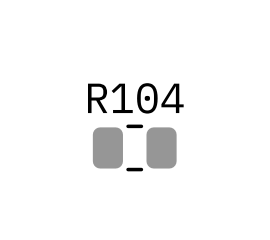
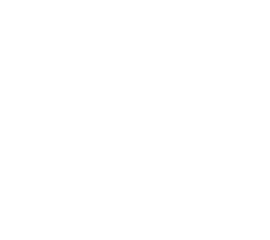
R104: (134, 147) -> none

